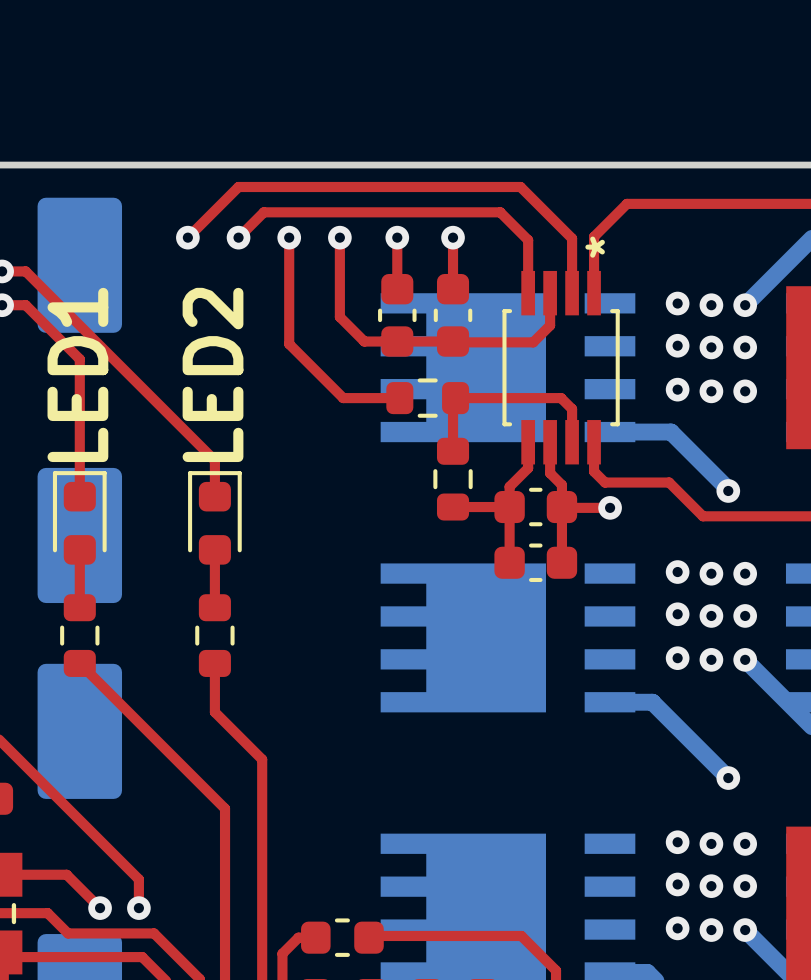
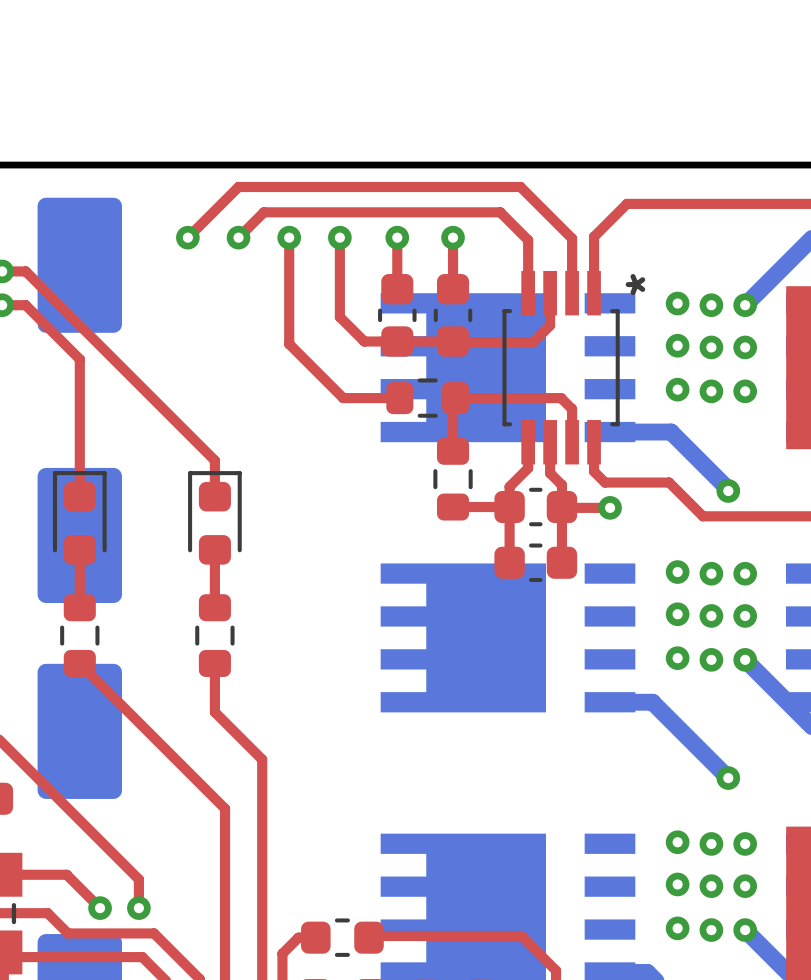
part text position: * (595, 247) -> * (635, 284)
text: LED1 (77, 374) -> none
text: LED2 (213, 374) -> none

